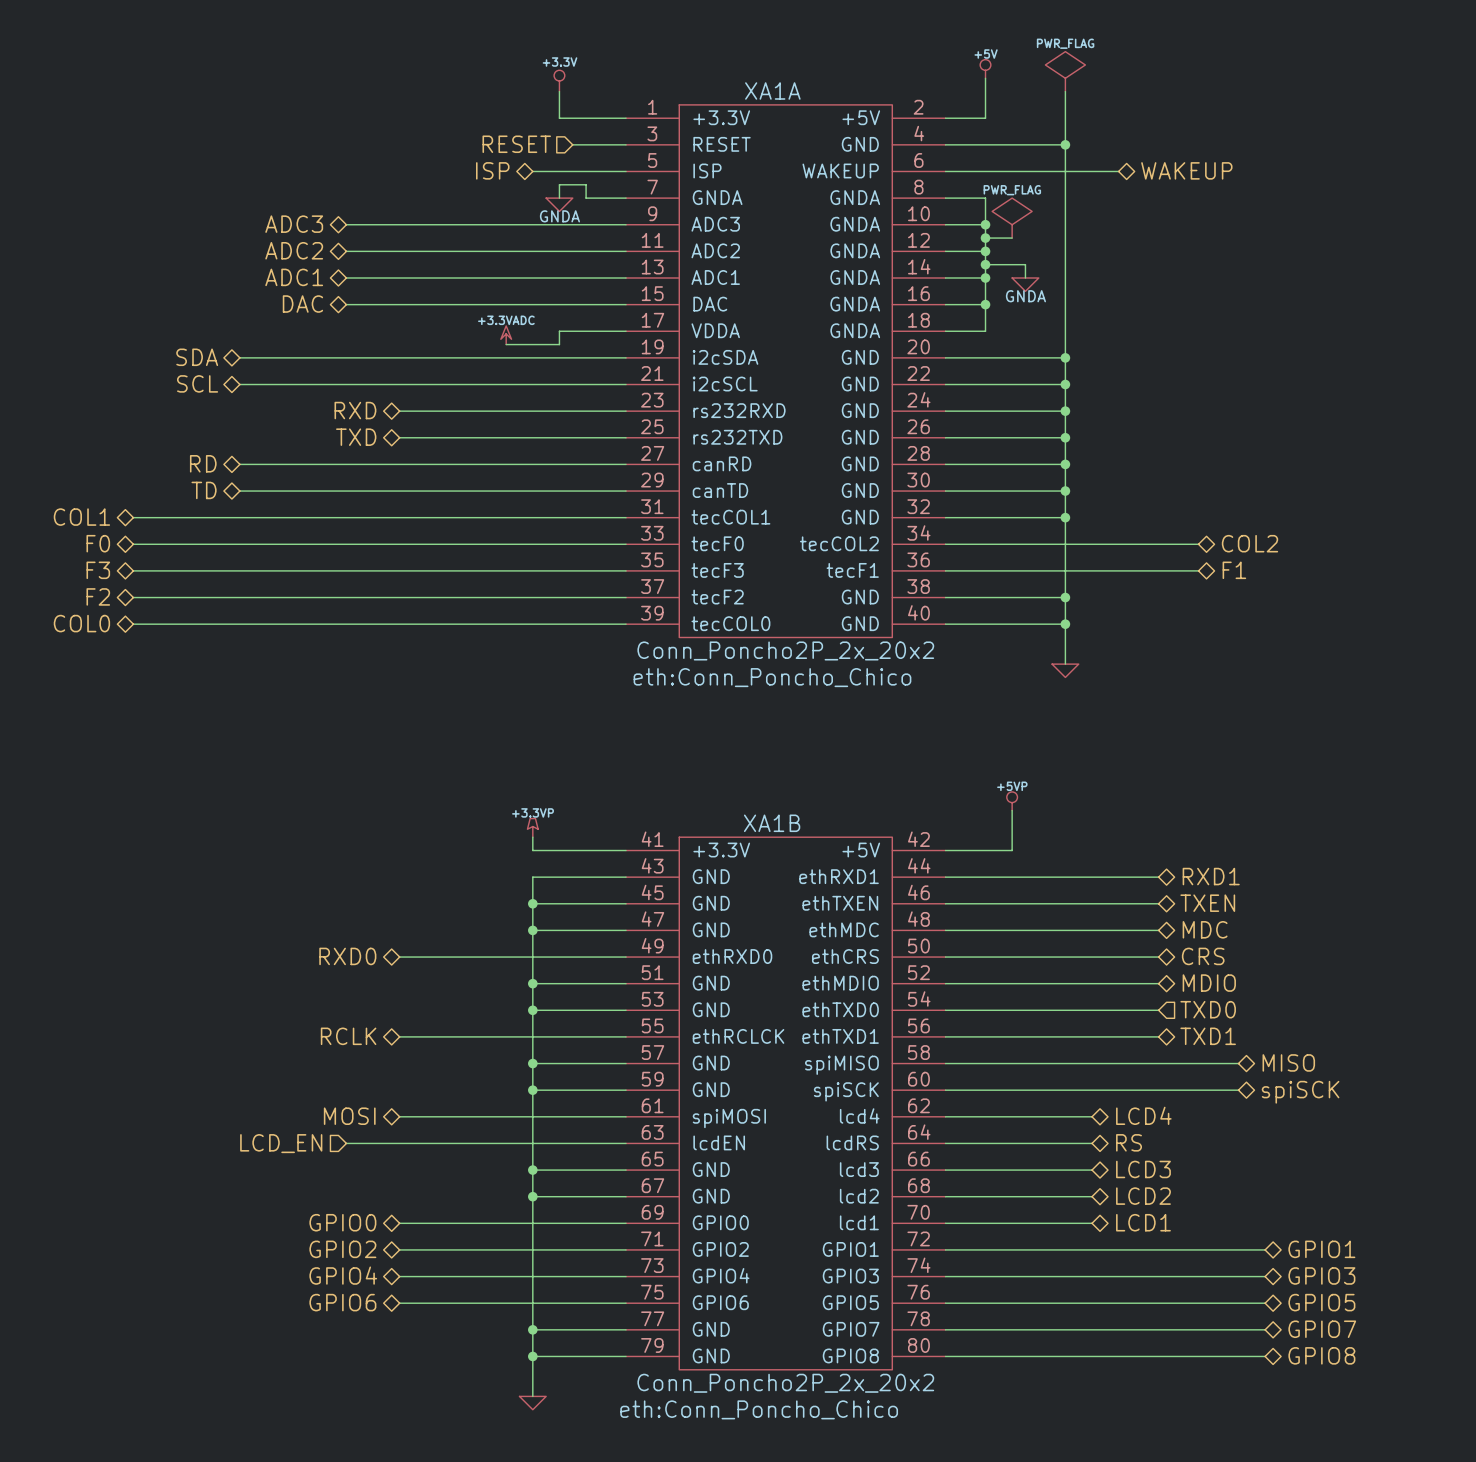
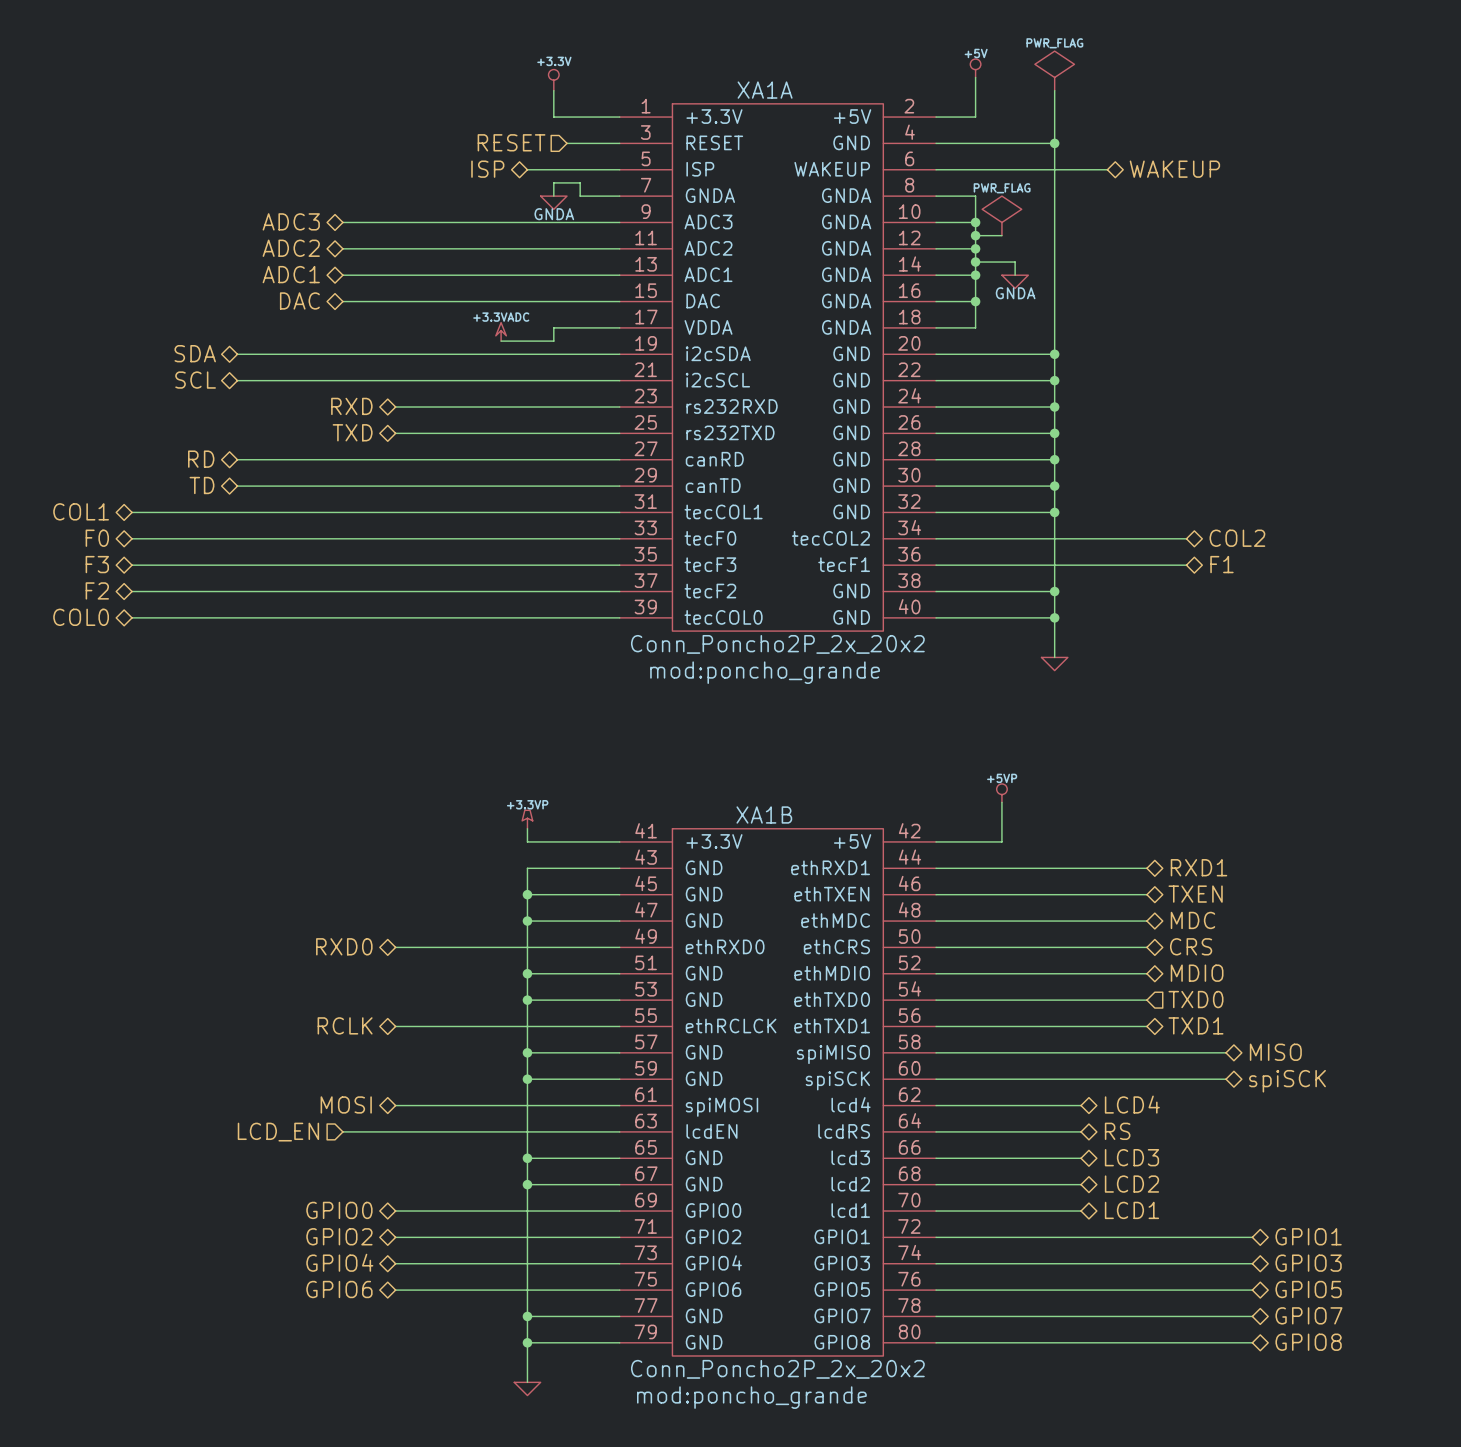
XA1A text: eth:Conn_Poncho_Chico (772, 677) -> mod:poncho_grande (765, 672)
XA1B text: eth:Conn_Poncho_Chico (759, 1409) -> mod:poncho_grande (751, 1397)

